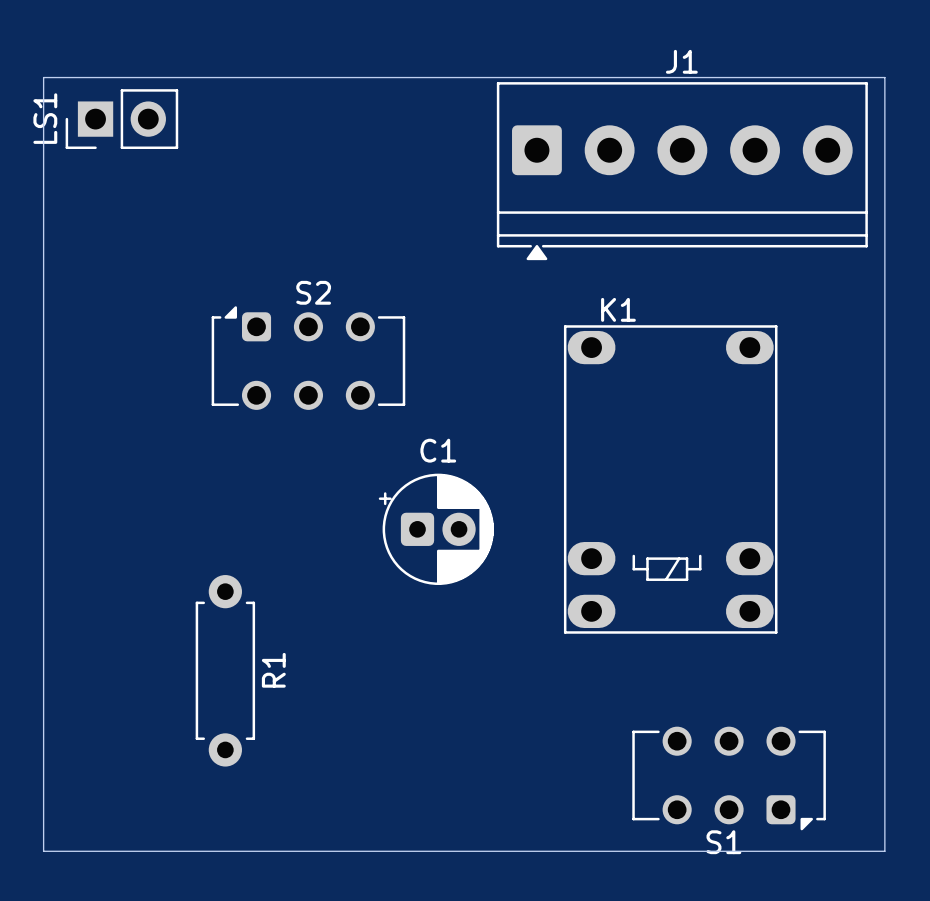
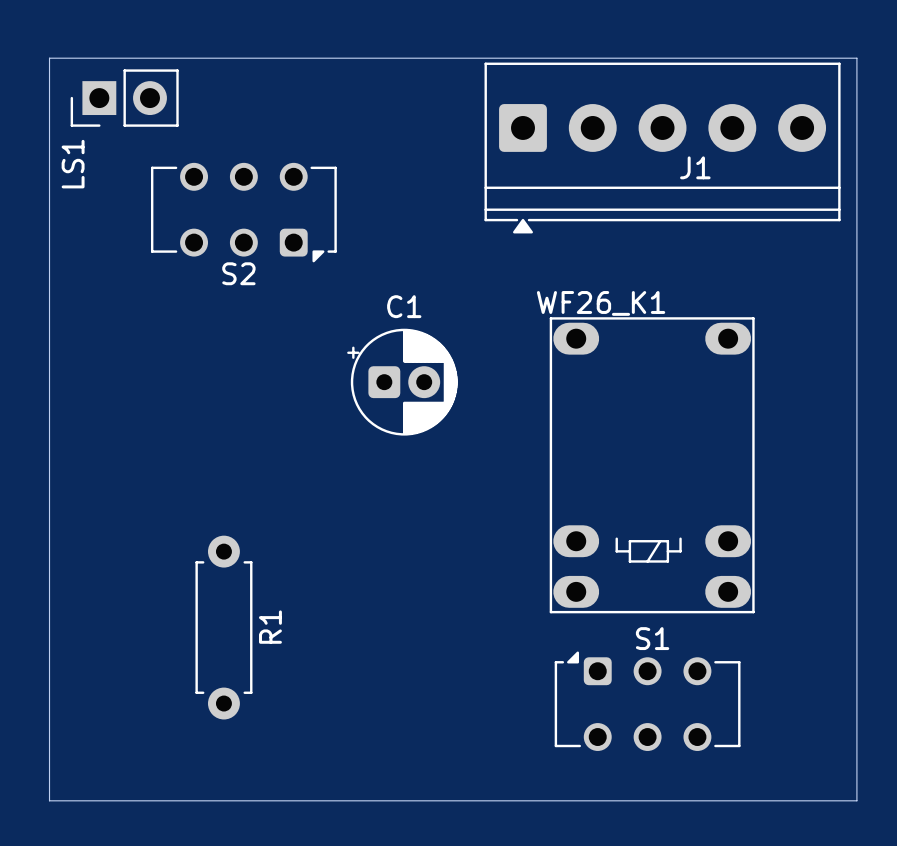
J1 name position: J1 (681, 61) -> J1 (695, 167)
LS1 name position: LS1 (45, 118) -> LS1 (73, 164)
S2 rotation: 0° (308, 358) -> 180° (243, 212)
S2 position: (308, 358) -> (243, 212)
K1: (670, 479) -> none
WF26_K1: none -> (652, 465)
C1 position: (436, 529) -> (402, 382)
S1 rotation: 0° (729, 778) -> 180° (647, 701)

